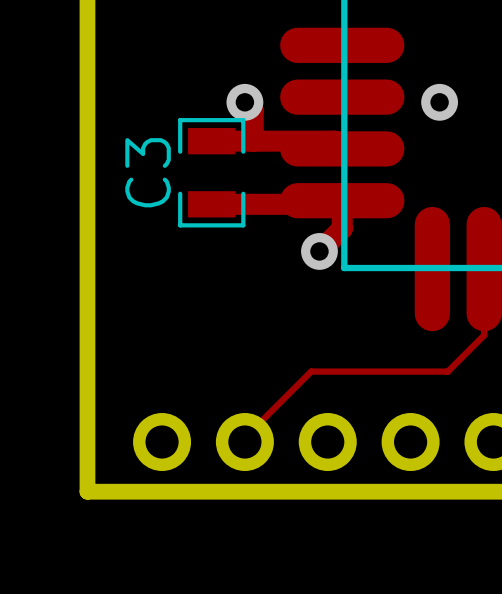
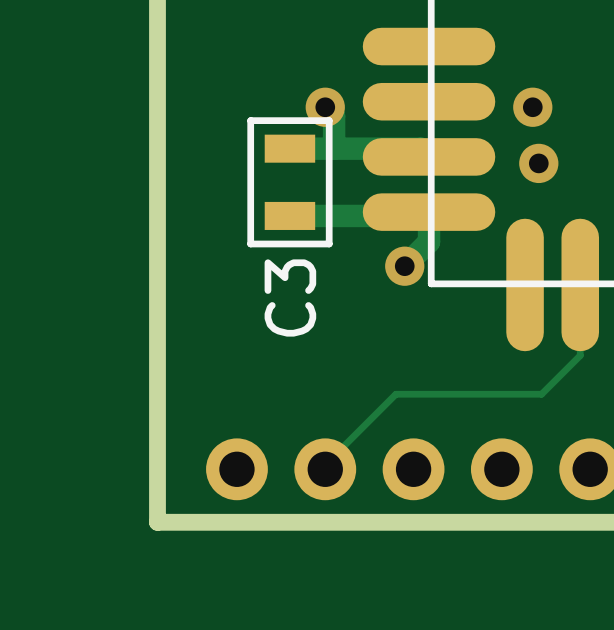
C3 footprint: [178, 118, 246, 228] -> [247, 117, 333, 248]
via: none -> (538, 163)
C3 name position: C3 (148, 172) -> C3 (290, 297)

